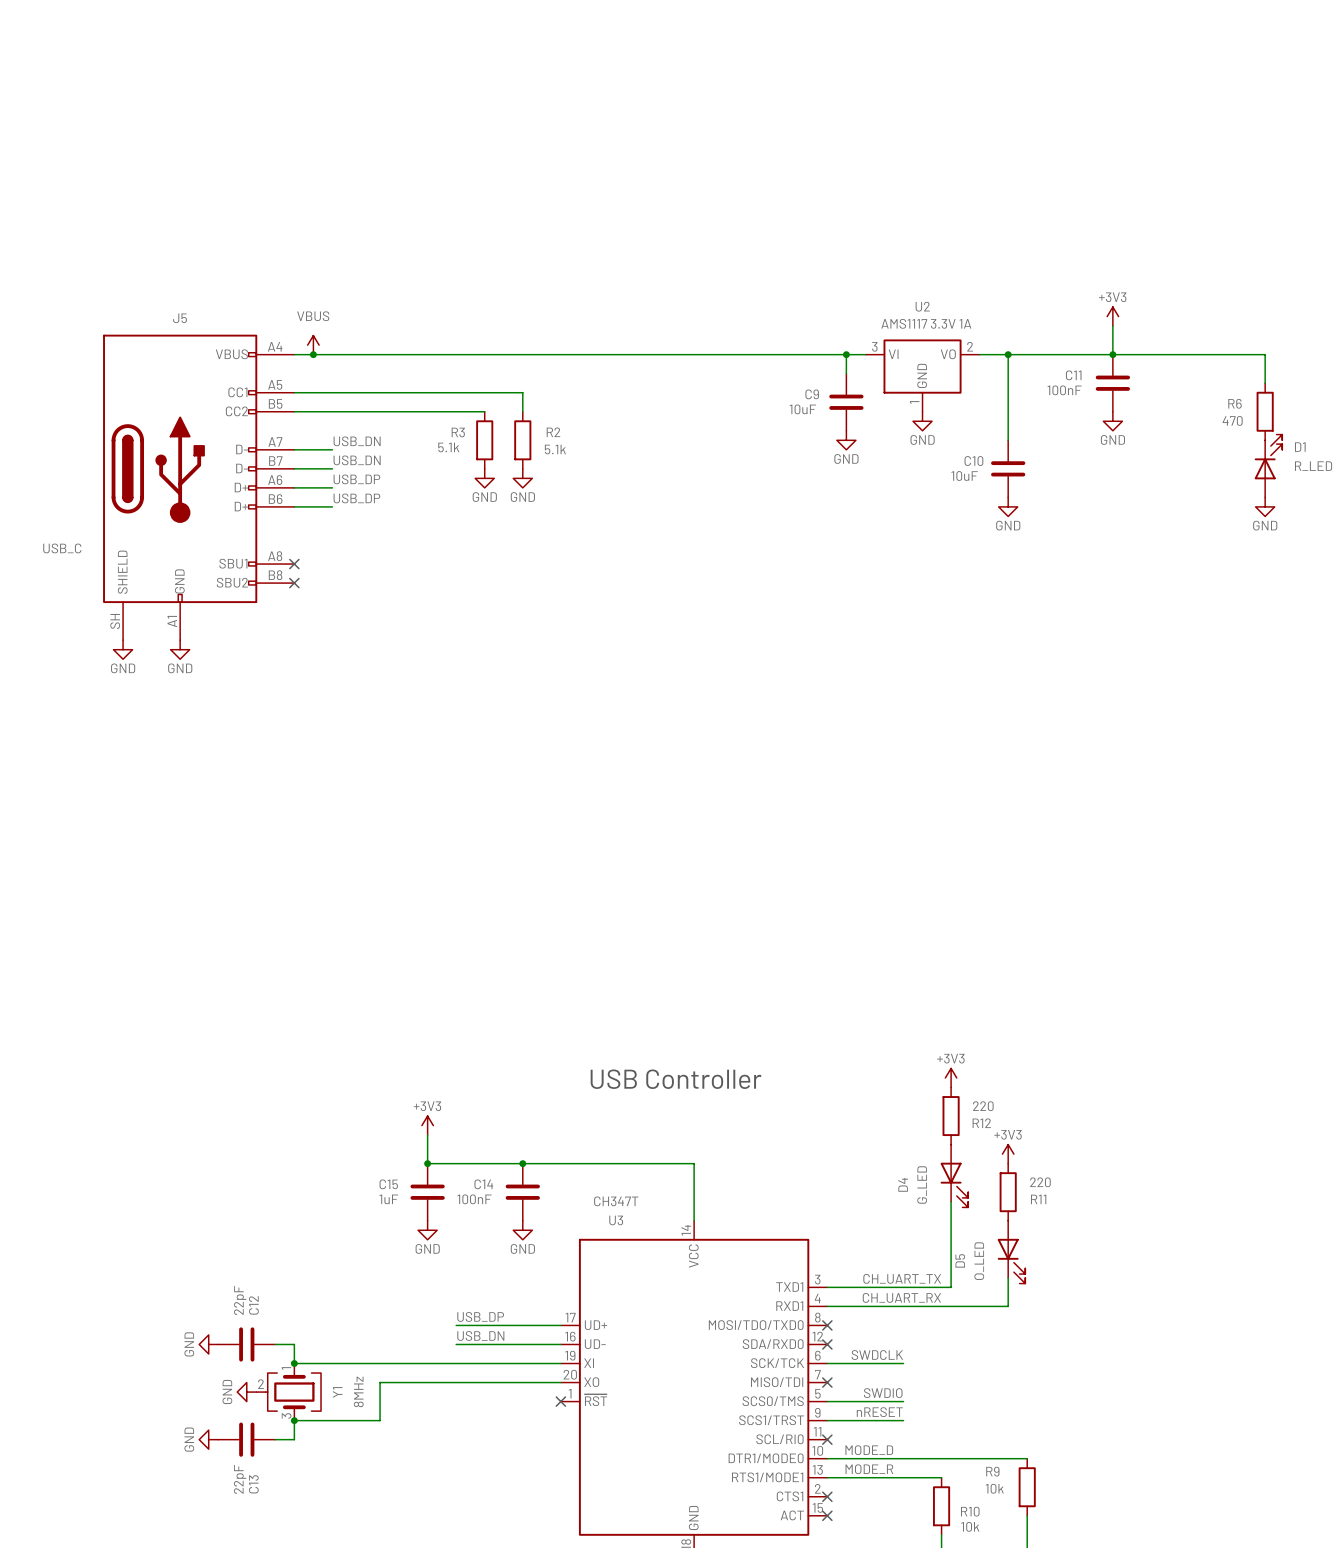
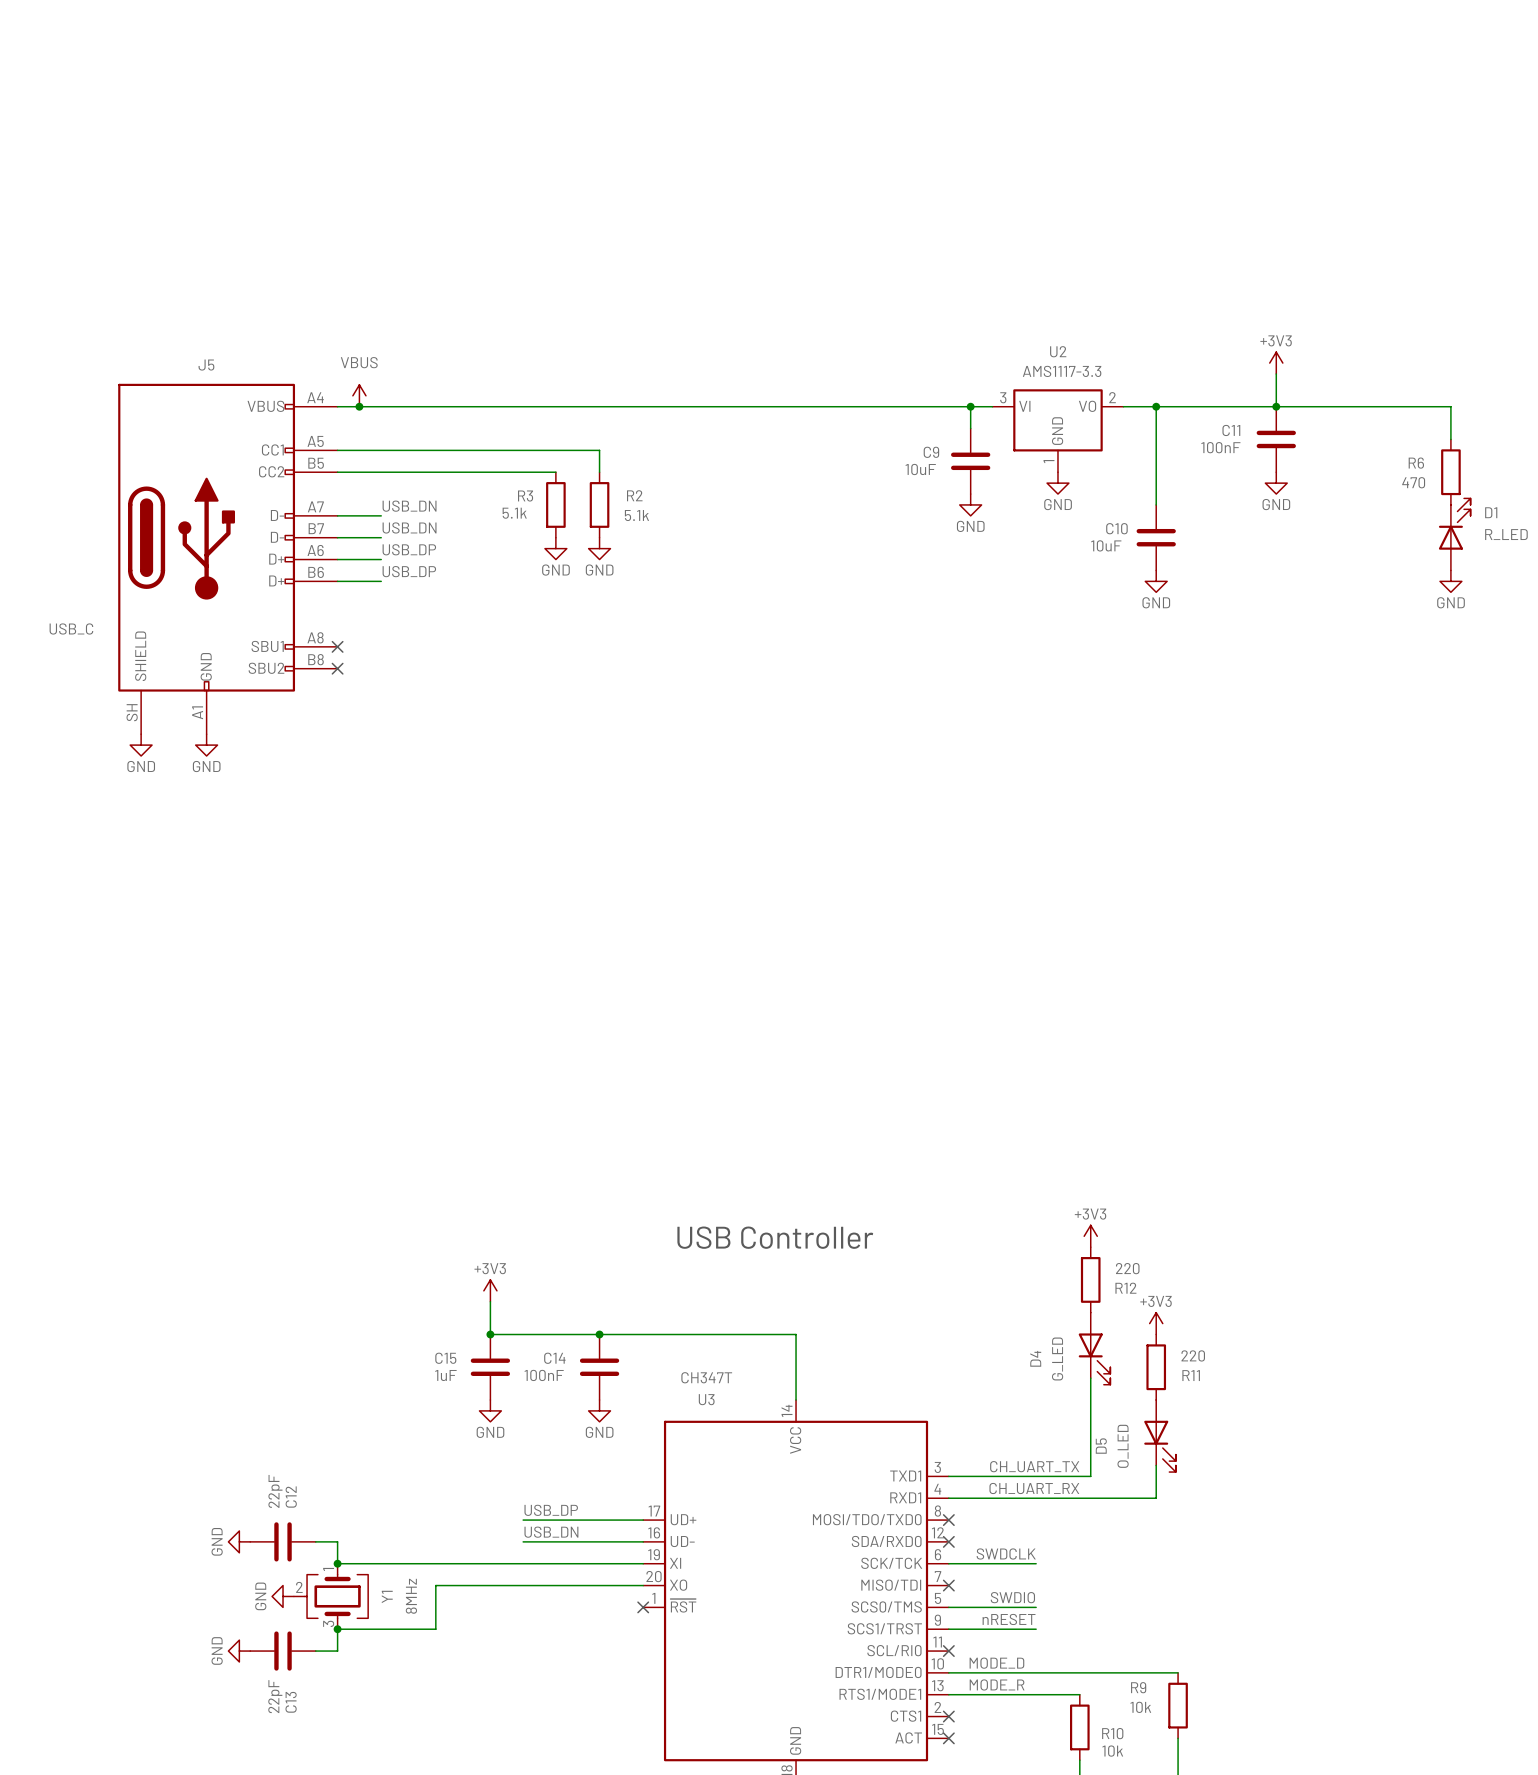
U2 value: AMS1117 3.3V 1A (926, 323) -> AMS1117-3.3 (1062, 371)

